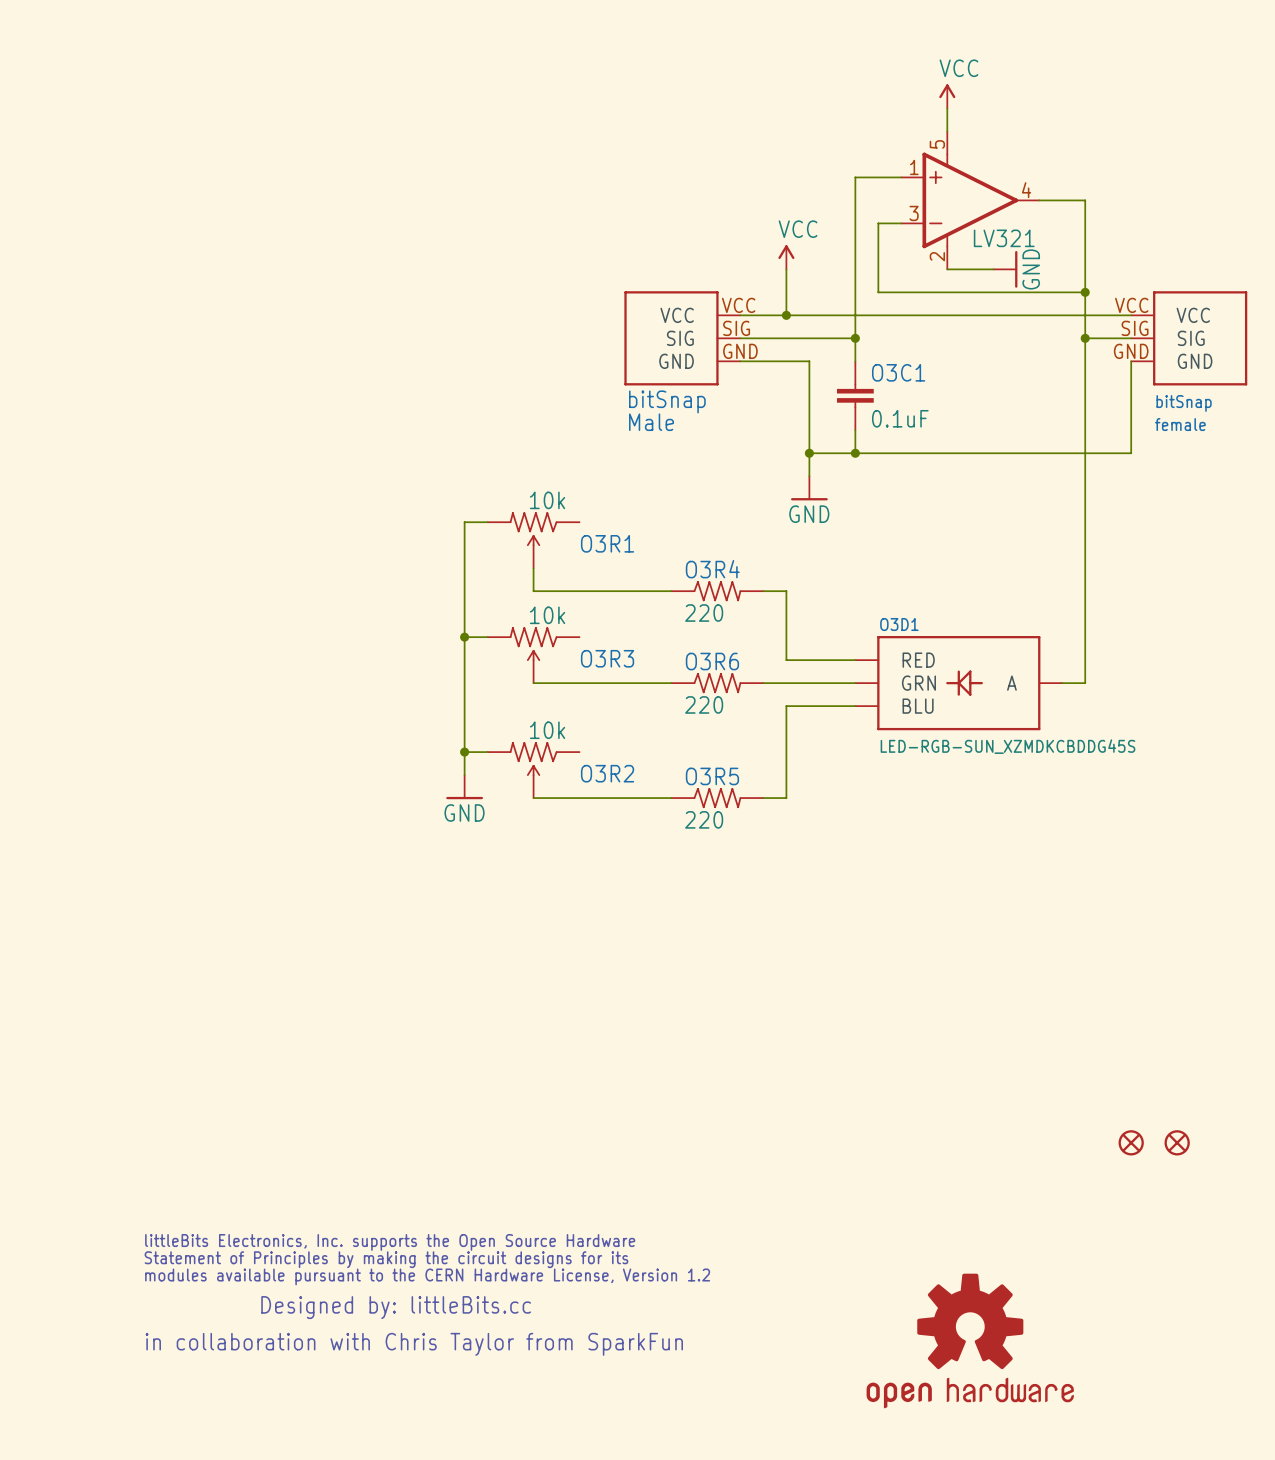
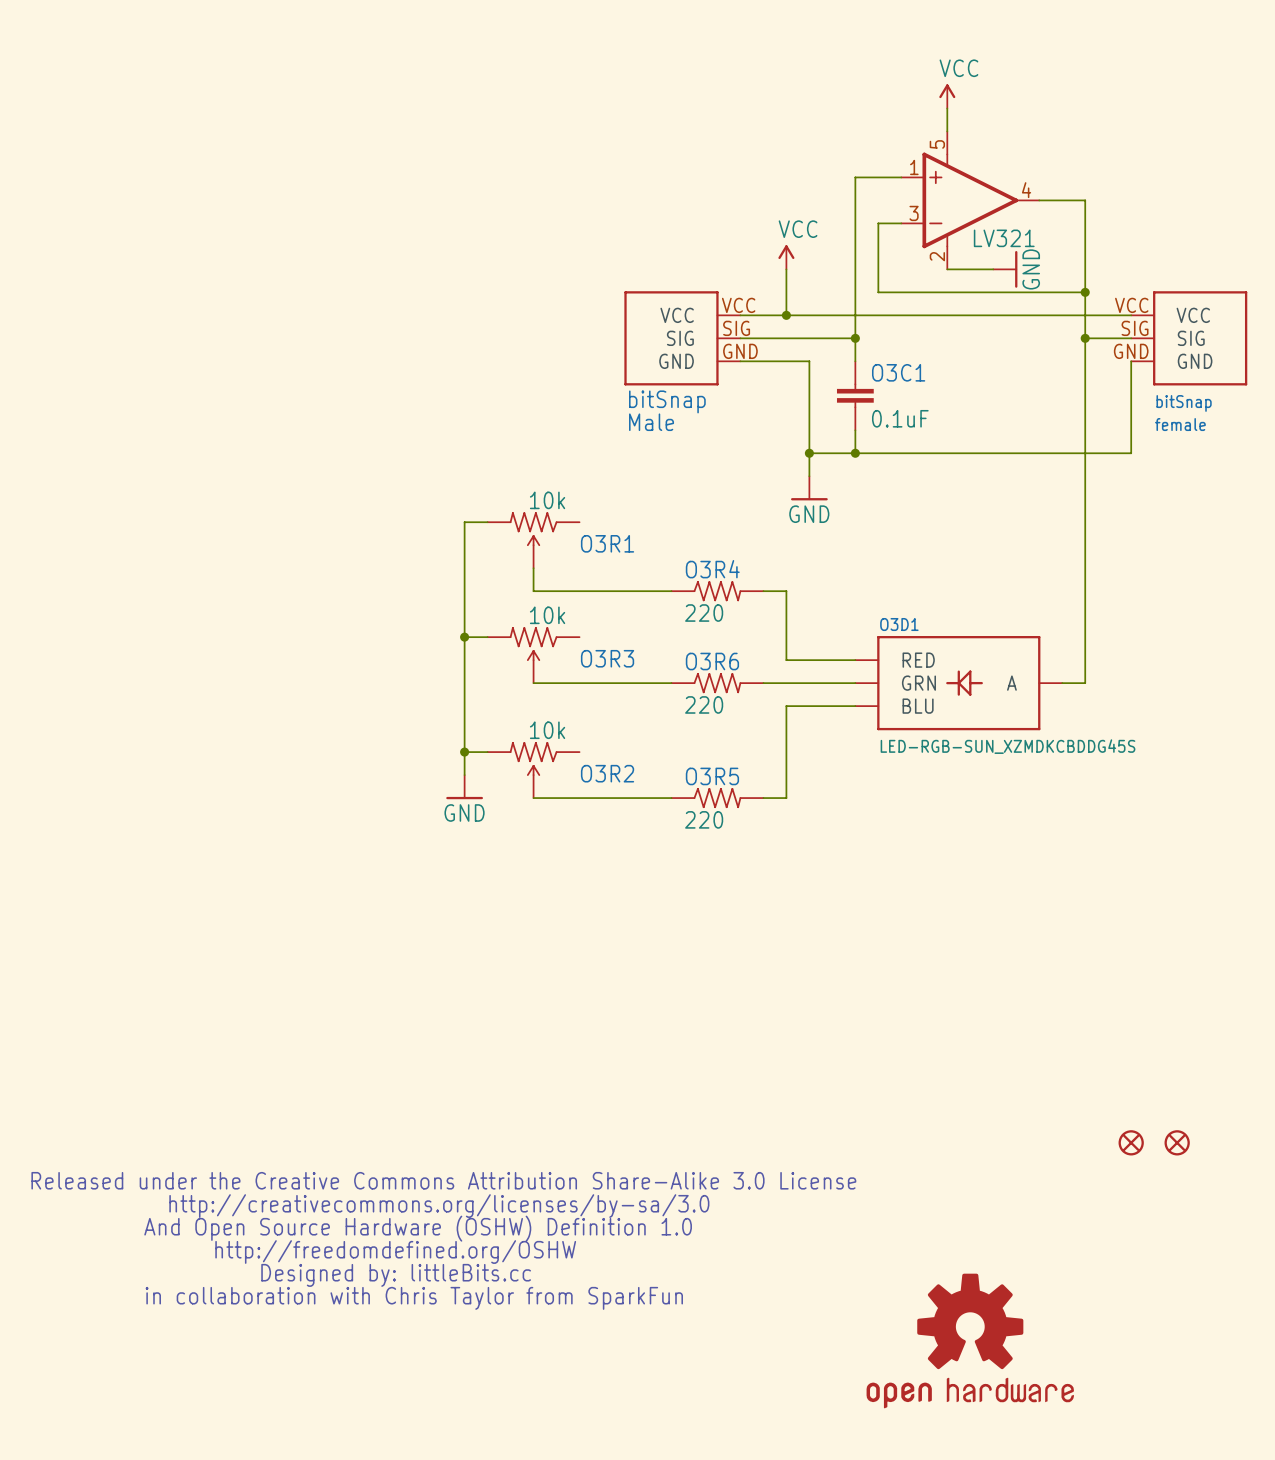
part: none -> (443, 1240)
part: (427, 1276) -> none
text: in collaboration with Chris Taylor from SparkFun (414, 1344) -> none

